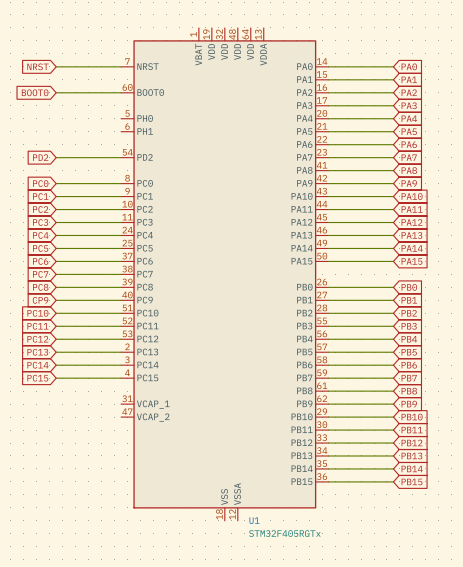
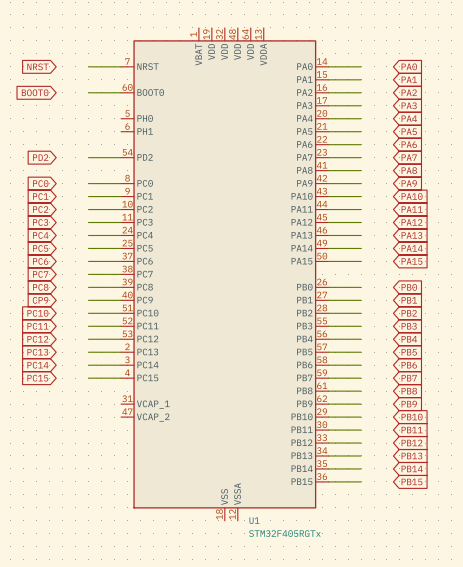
wire: (56, 66) (88, 66) -> none
wire: (361, 66) (393, 66) -> none
wire: (361, 79) (393, 79) -> none
wire: (56, 92) (88, 92) -> none
wire: (361, 92) (393, 92) -> none
wire: (361, 105) (393, 105) -> none
wire: (361, 118) (393, 118) -> none
wire: (361, 131) (393, 131) -> none
wire: (361, 144) (393, 144) -> none
wire: (56, 157) (88, 157) -> none
wire: (361, 157) (393, 157) -> none
wire: (361, 170) (393, 170) -> none
wire: (56, 183) (88, 183) -> none
wire: (361, 183) (393, 183) -> none
wire: (56, 196) (88, 196) -> none
wire: (361, 196) (393, 196) -> none
wire: (56, 209) (88, 209) -> none
wire: (361, 209) (393, 209) -> none
wire: (56, 222) (88, 222) -> none
wire: (361, 222) (393, 222) -> none
wire: (56, 235) (88, 235) -> none
wire: (361, 235) (393, 235) -> none
wire: (56, 248) (88, 248) -> none
wire: (361, 248) (393, 248) -> none
wire: (56, 261) (88, 261) -> none
wire: (361, 261) (393, 261) -> none
wire: (56, 274) (88, 274) -> none
wire: (56, 287) (88, 287) -> none
wire: (361, 287) (393, 287) -> none
wire: (56, 300) (88, 300) -> none
wire: (361, 300) (393, 300) -> none
wire: (56, 313) (88, 313) -> none
wire: (361, 313) (393, 313) -> none
wire: (56, 326) (88, 326) -> none
wire: (361, 326) (393, 326) -> none
wire: (56, 339) (88, 339) -> none
wire: (361, 339) (393, 339) -> none
wire: (56, 352) (88, 352) -> none
wire: (361, 352) (393, 352) -> none
wire: (56, 365) (88, 365) -> none
wire: (361, 365) (393, 365) -> none
wire: (56, 378) (88, 378) -> none
wire: (361, 378) (393, 378) -> none
wire: (361, 391) (393, 391) -> none
wire: (361, 404) (393, 404) -> none
wire: (361, 417) (393, 417) -> none
wire: (361, 430) (393, 430) -> none
wire: (361, 443) (393, 443) -> none
wire: (361, 455) (393, 455) -> none
wire: (361, 468) (393, 468) -> none
wire: (361, 481) (393, 481) -> none

